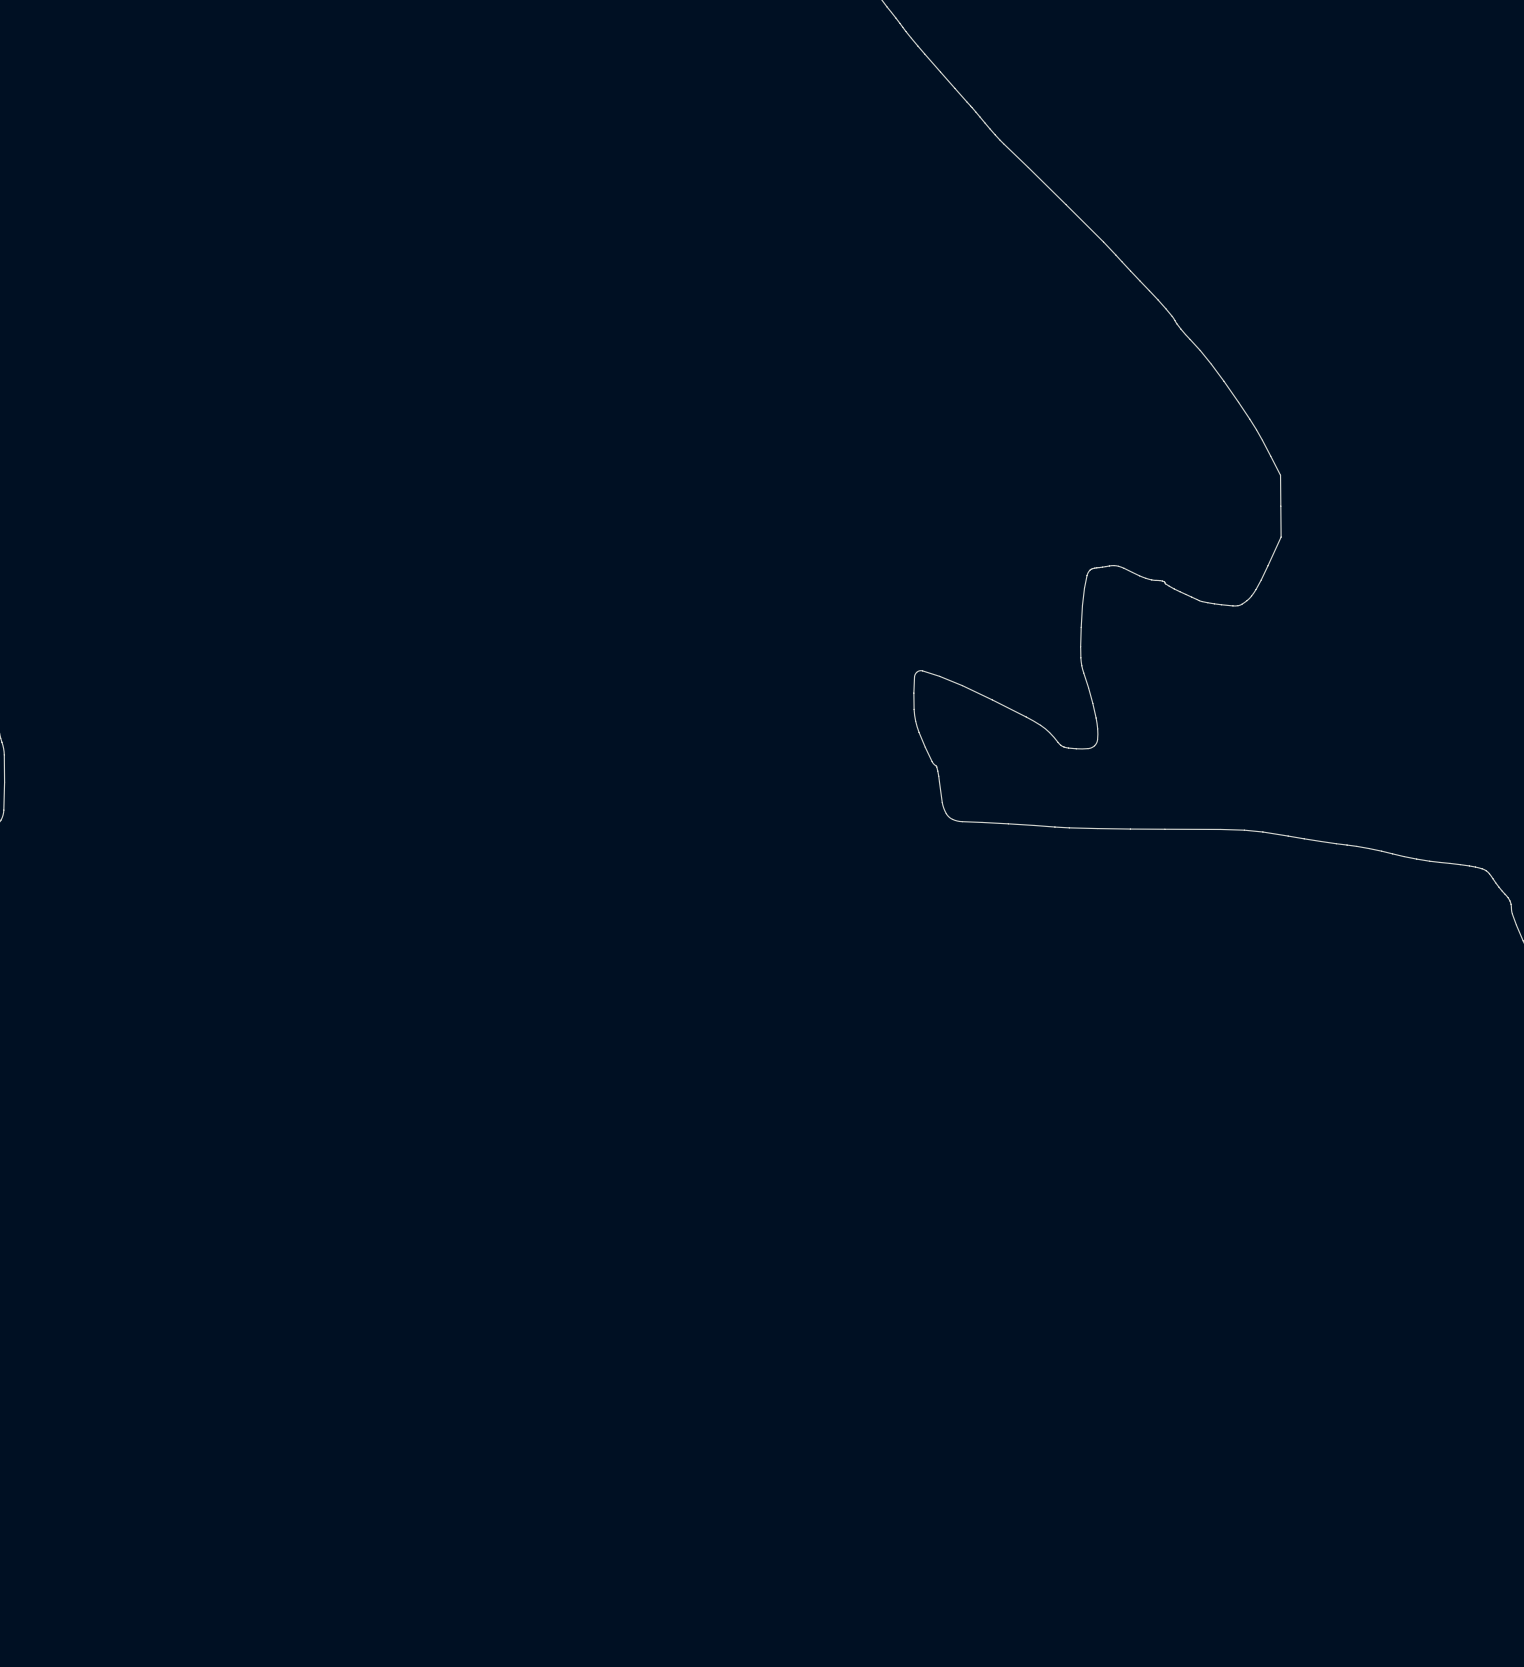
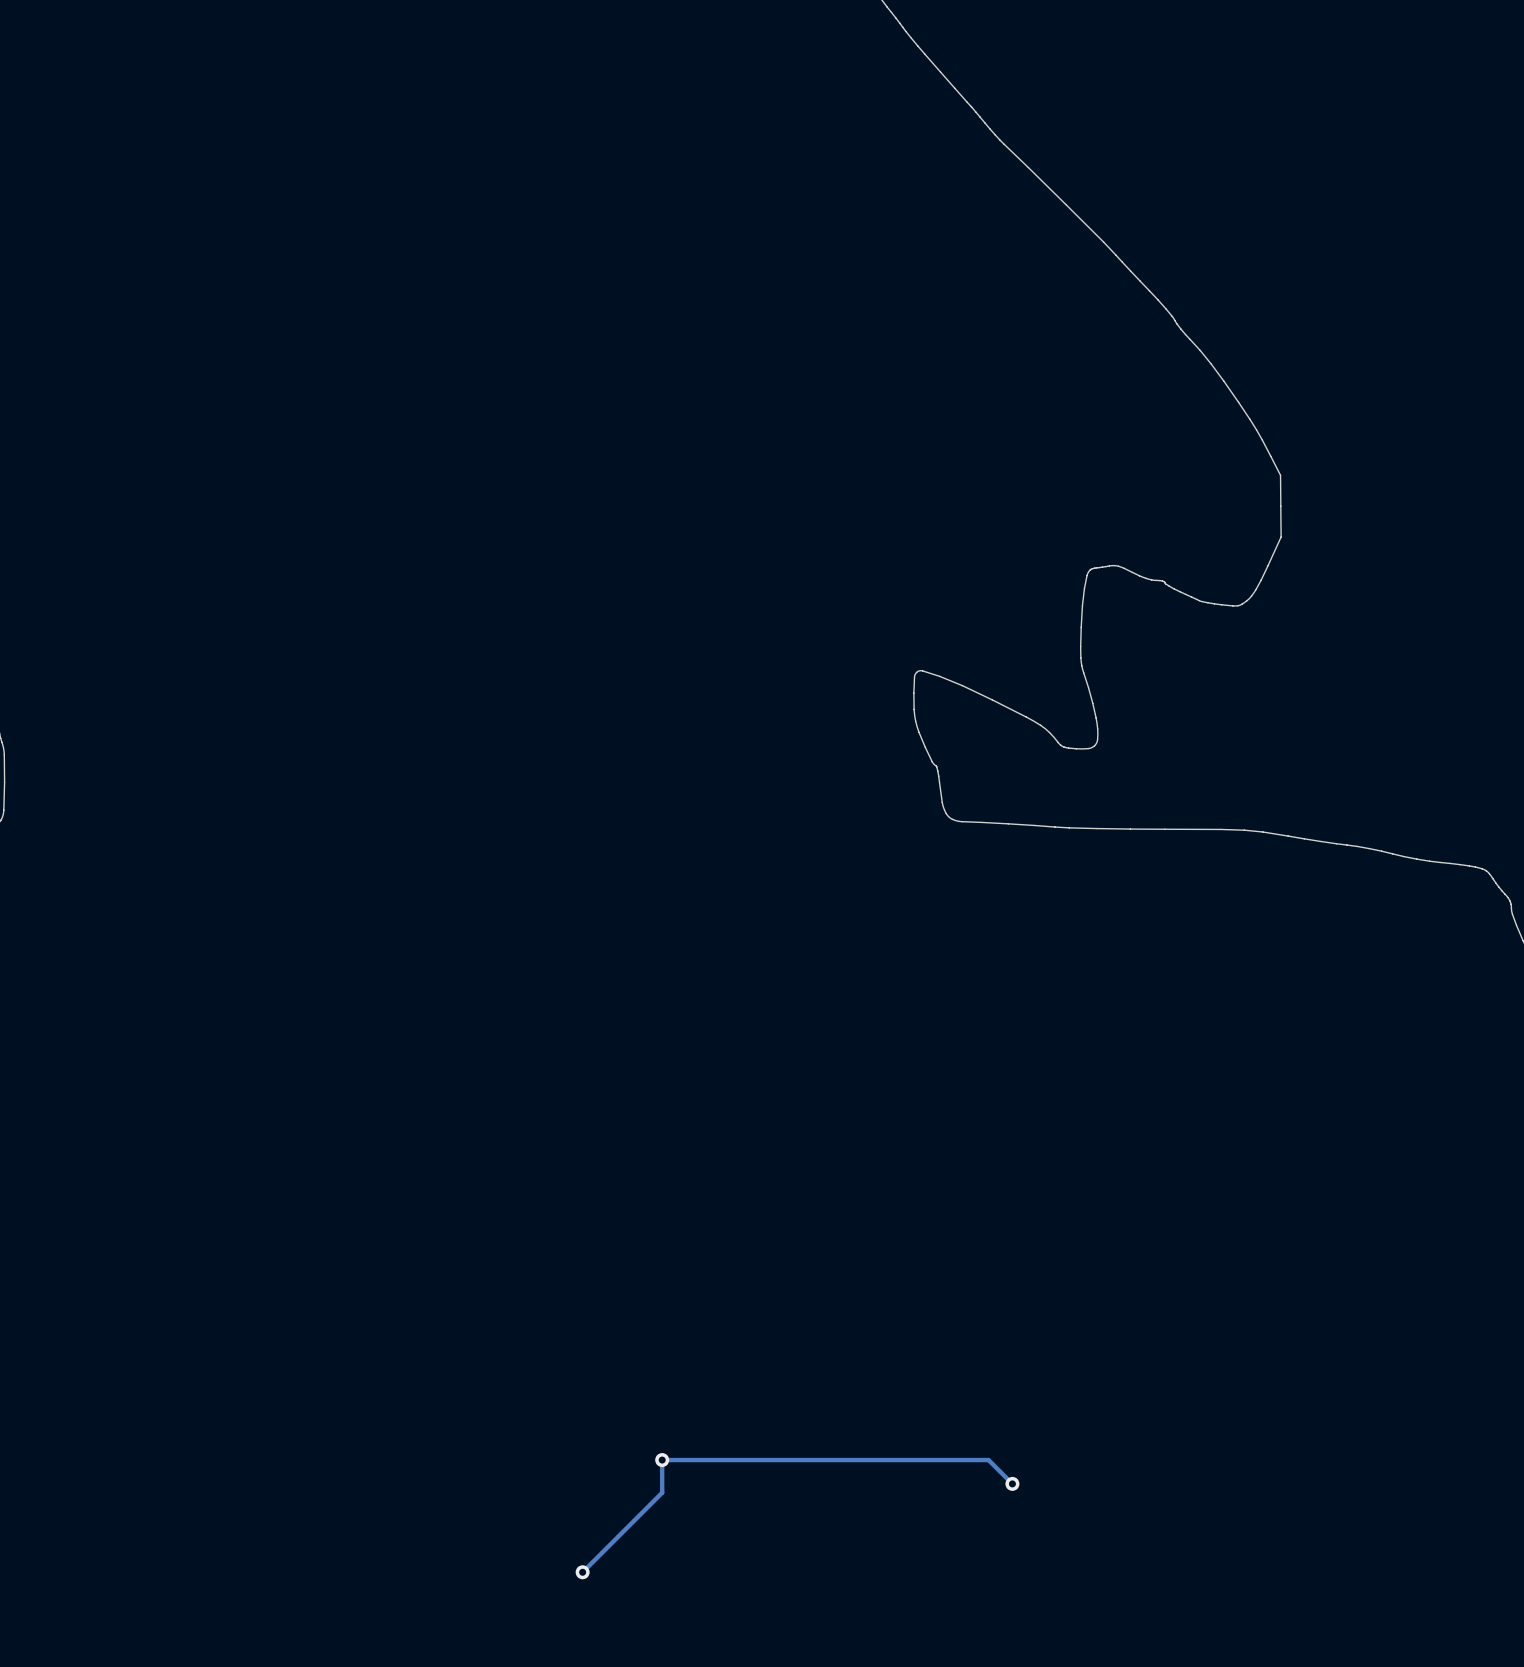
via: none -> (662, 1460)
track: none -> (1012, 1483) (988, 1460) (662, 1460) (662, 1492) (582, 1572)
via: none -> (1012, 1483)
via: none -> (582, 1572)

